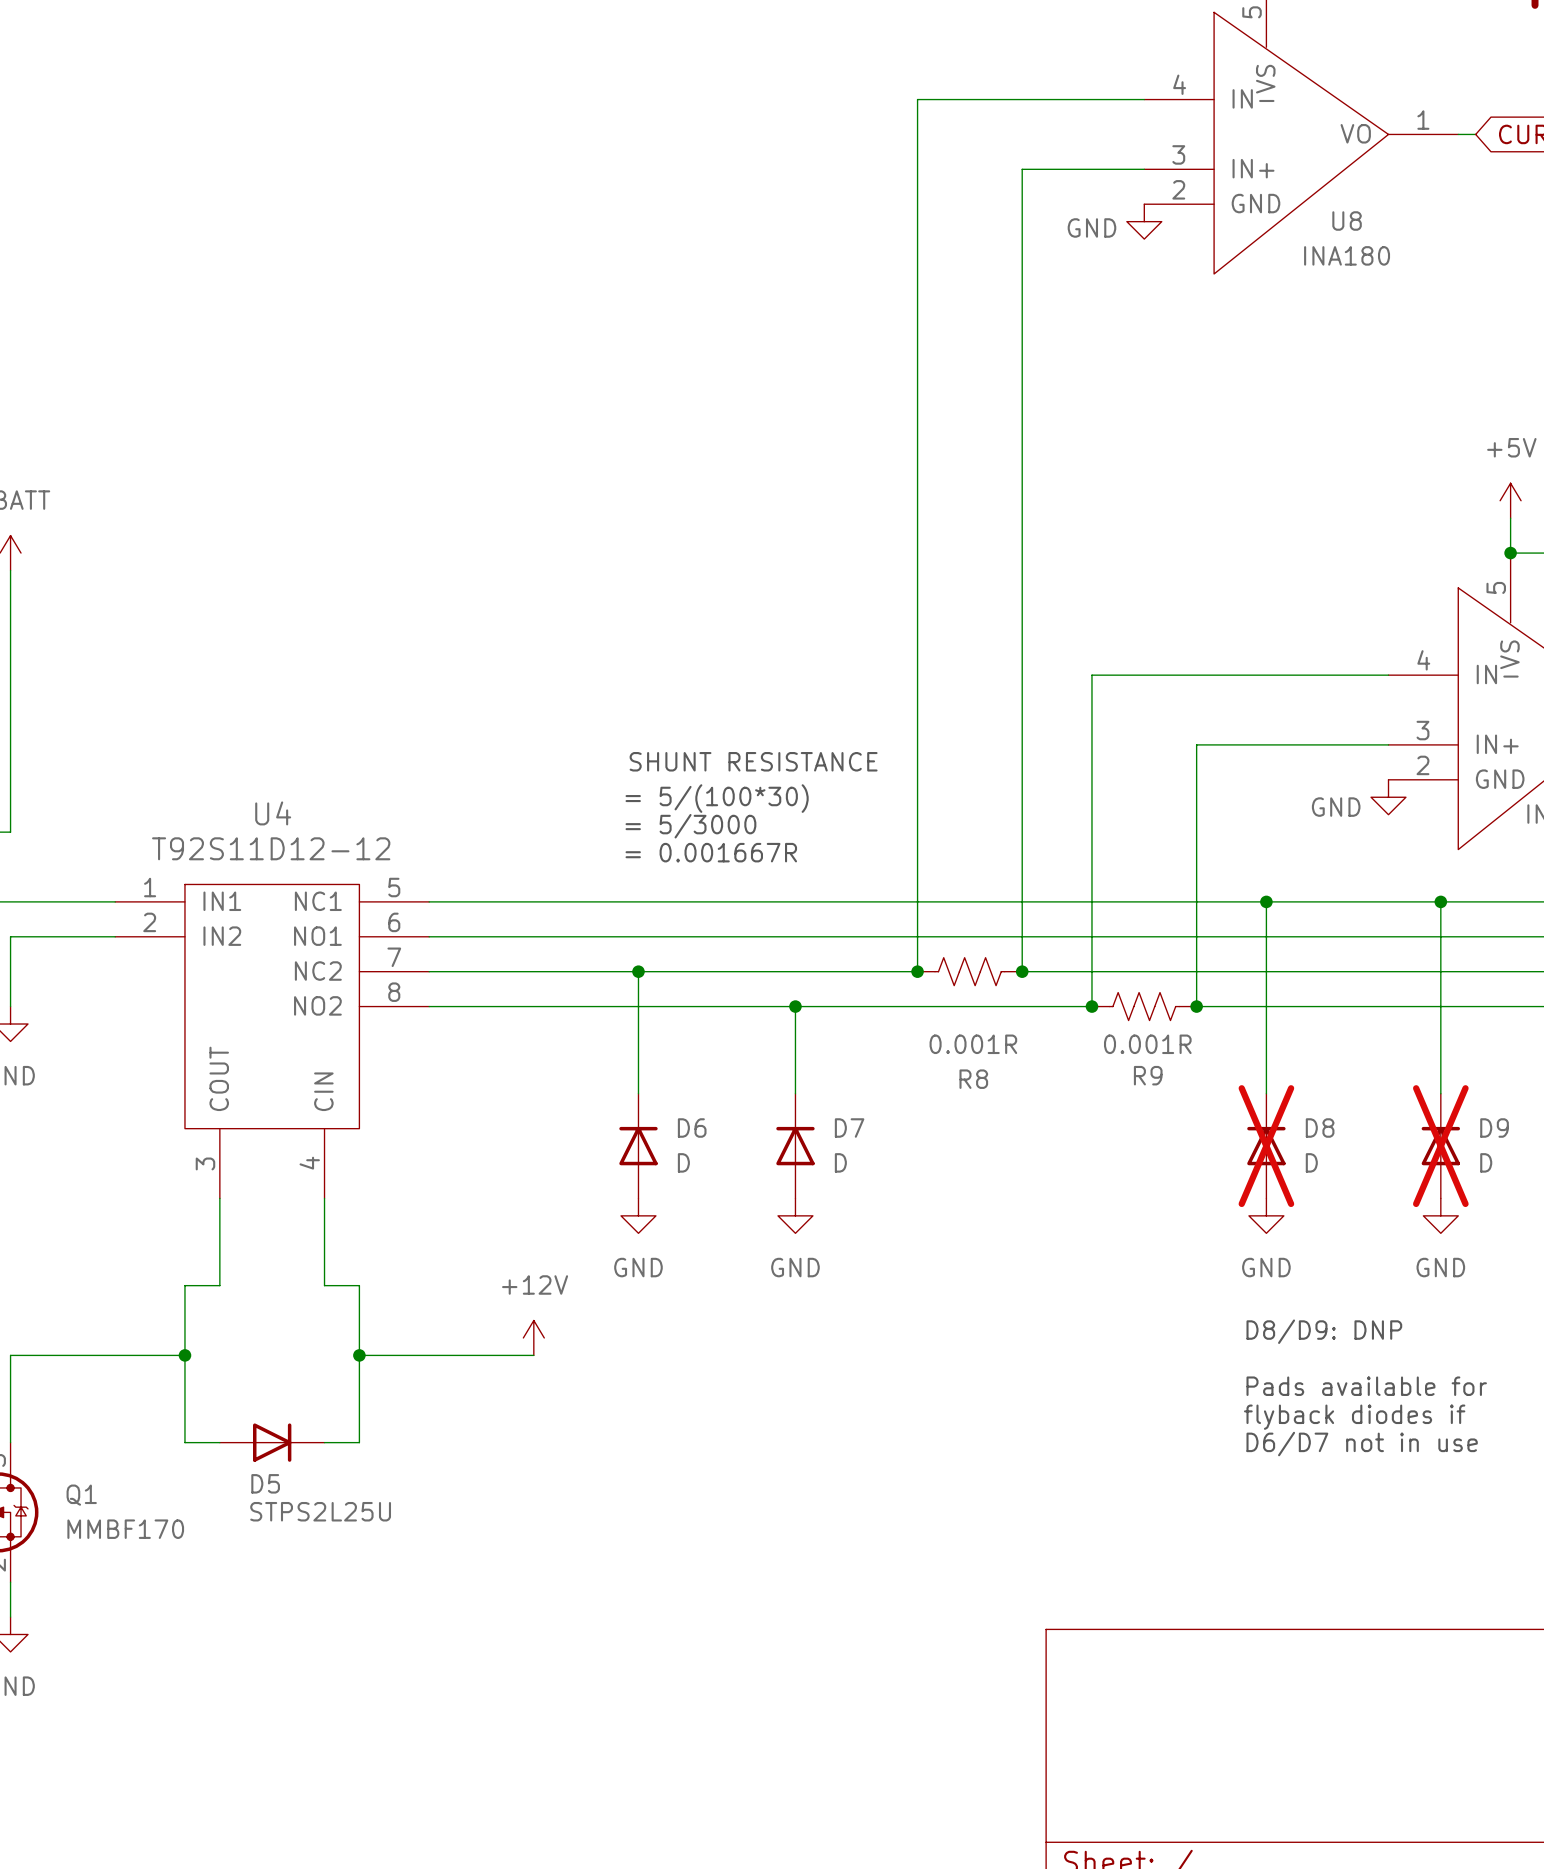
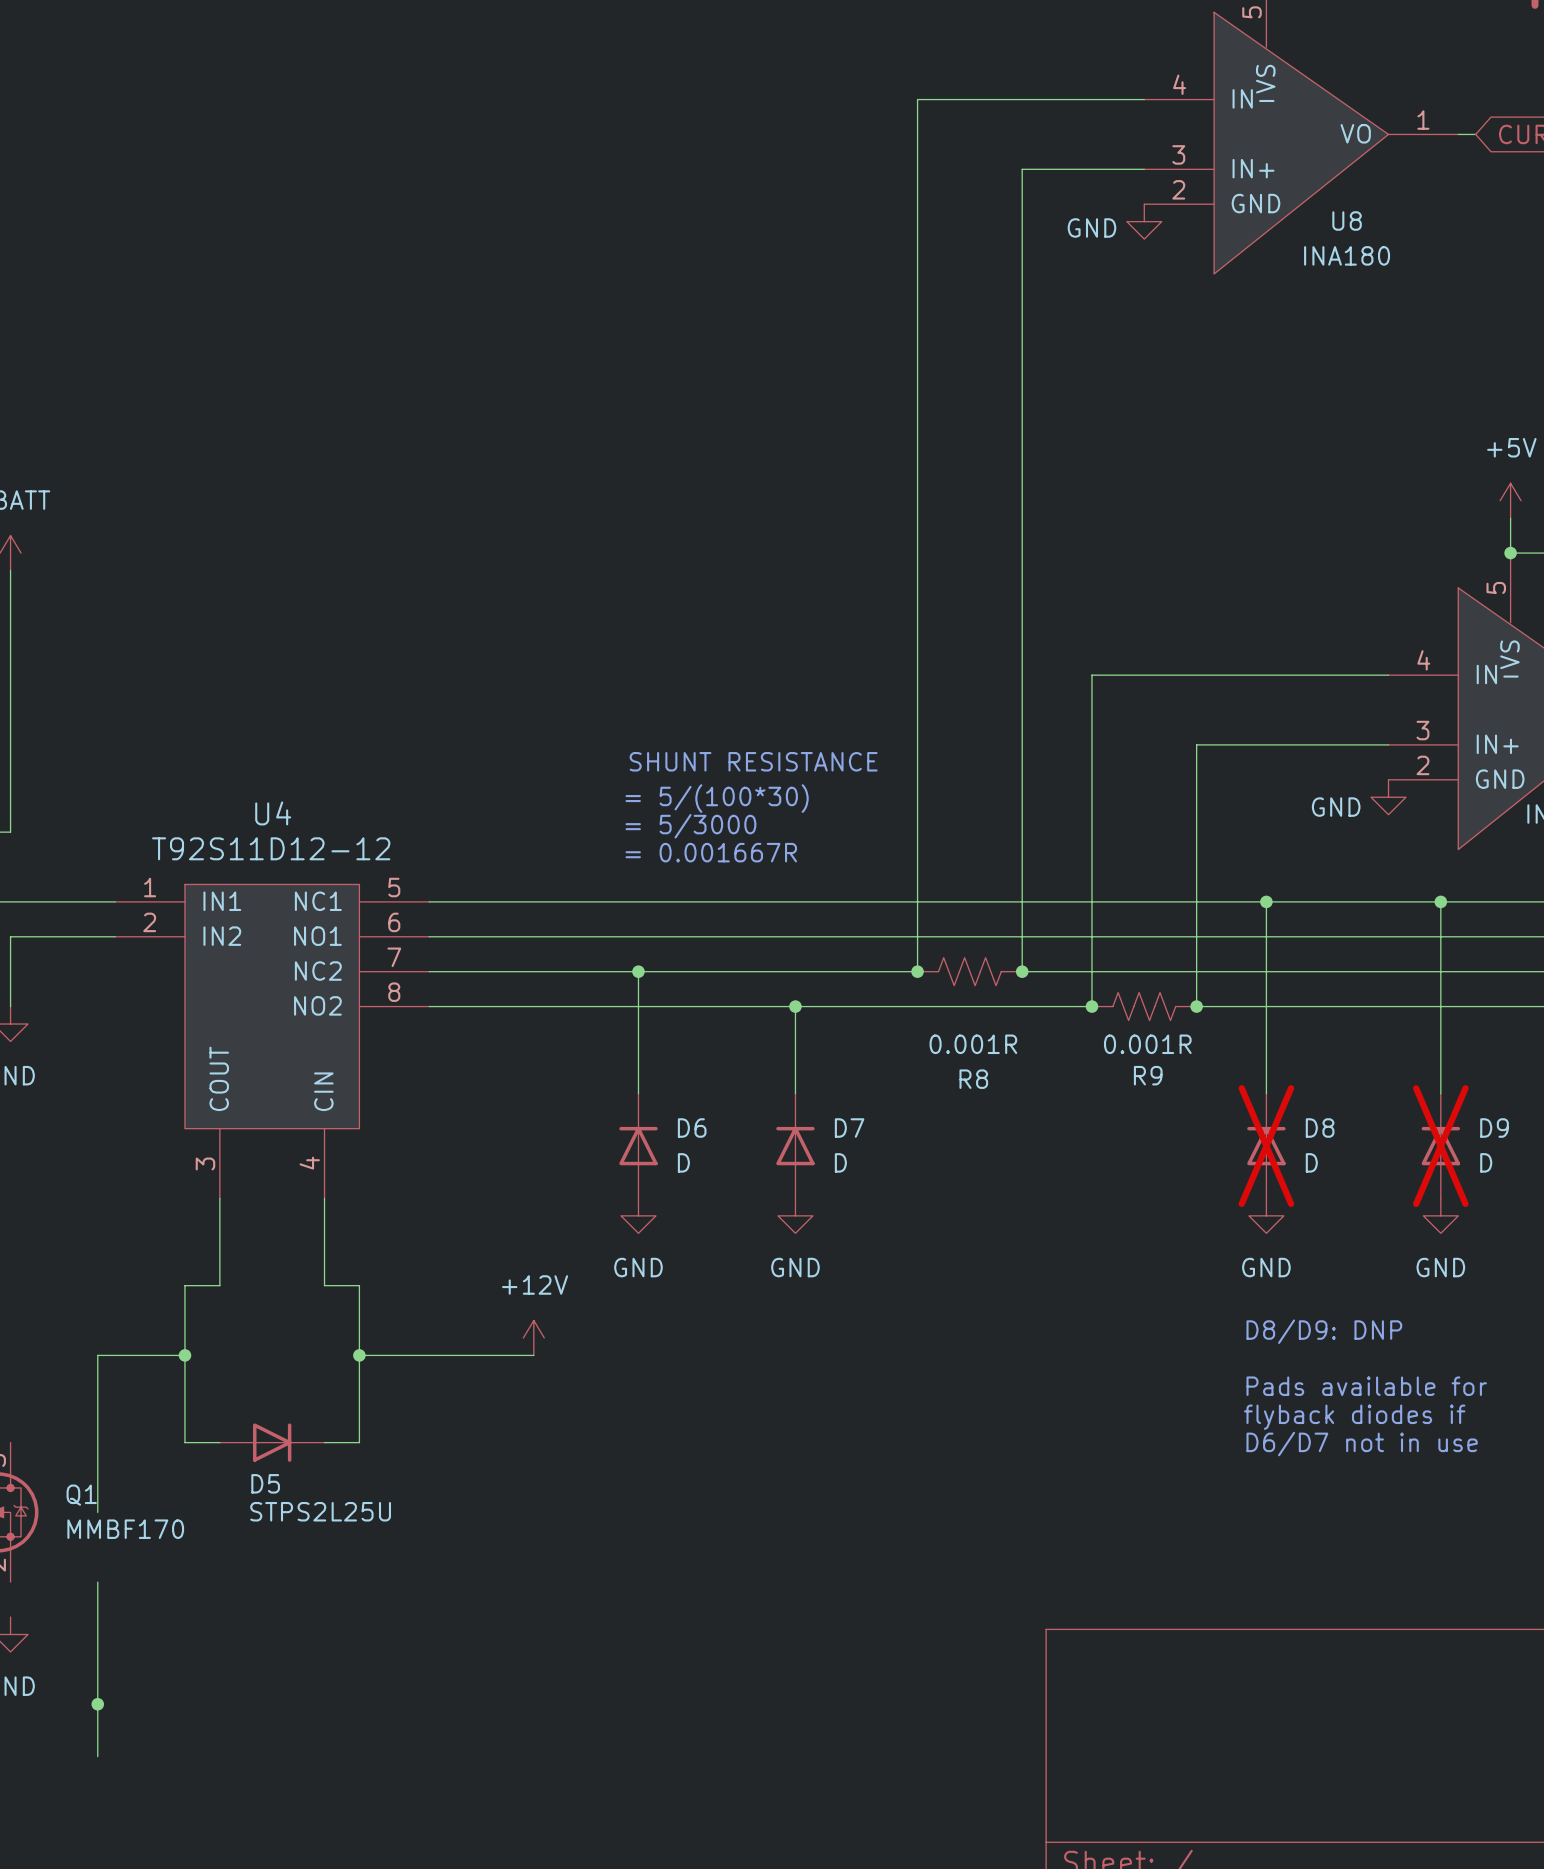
wire: (97, 1355) (10, 1355) (10, 1442) -> (97, 1355) (97, 1512)
wire: (10, 1582) (10, 1617) -> none
wire: none -> (97, 1582) (97, 1756)
junction: none -> (97, 1704)

